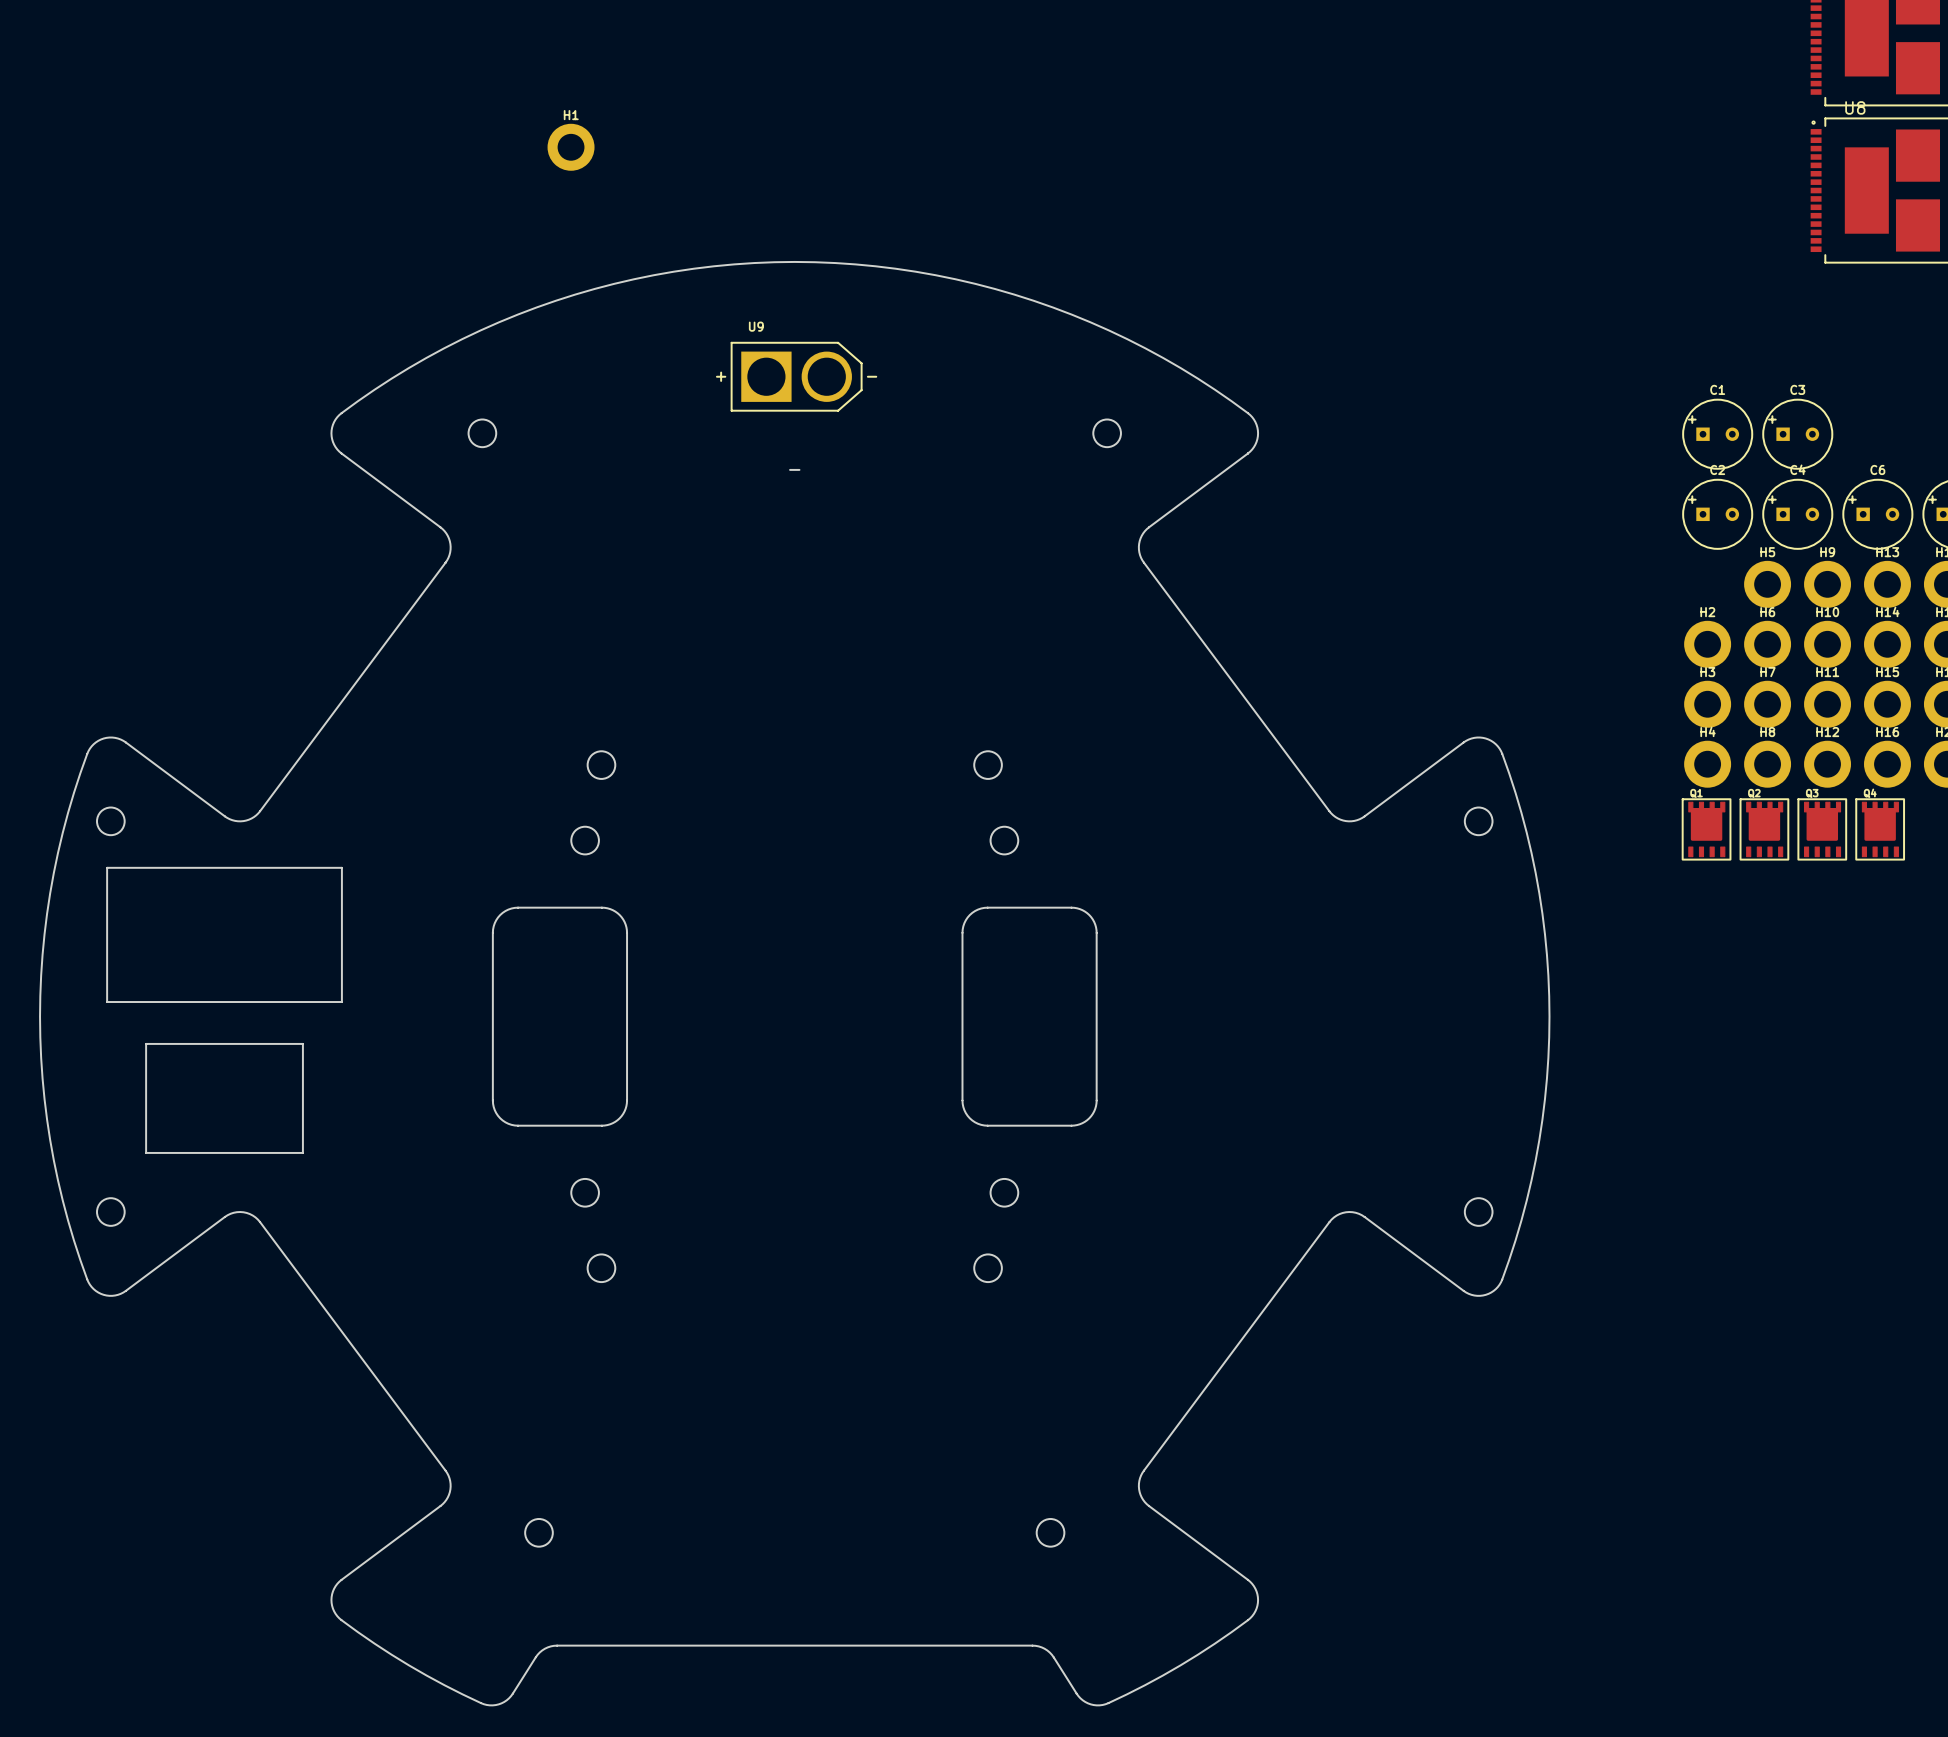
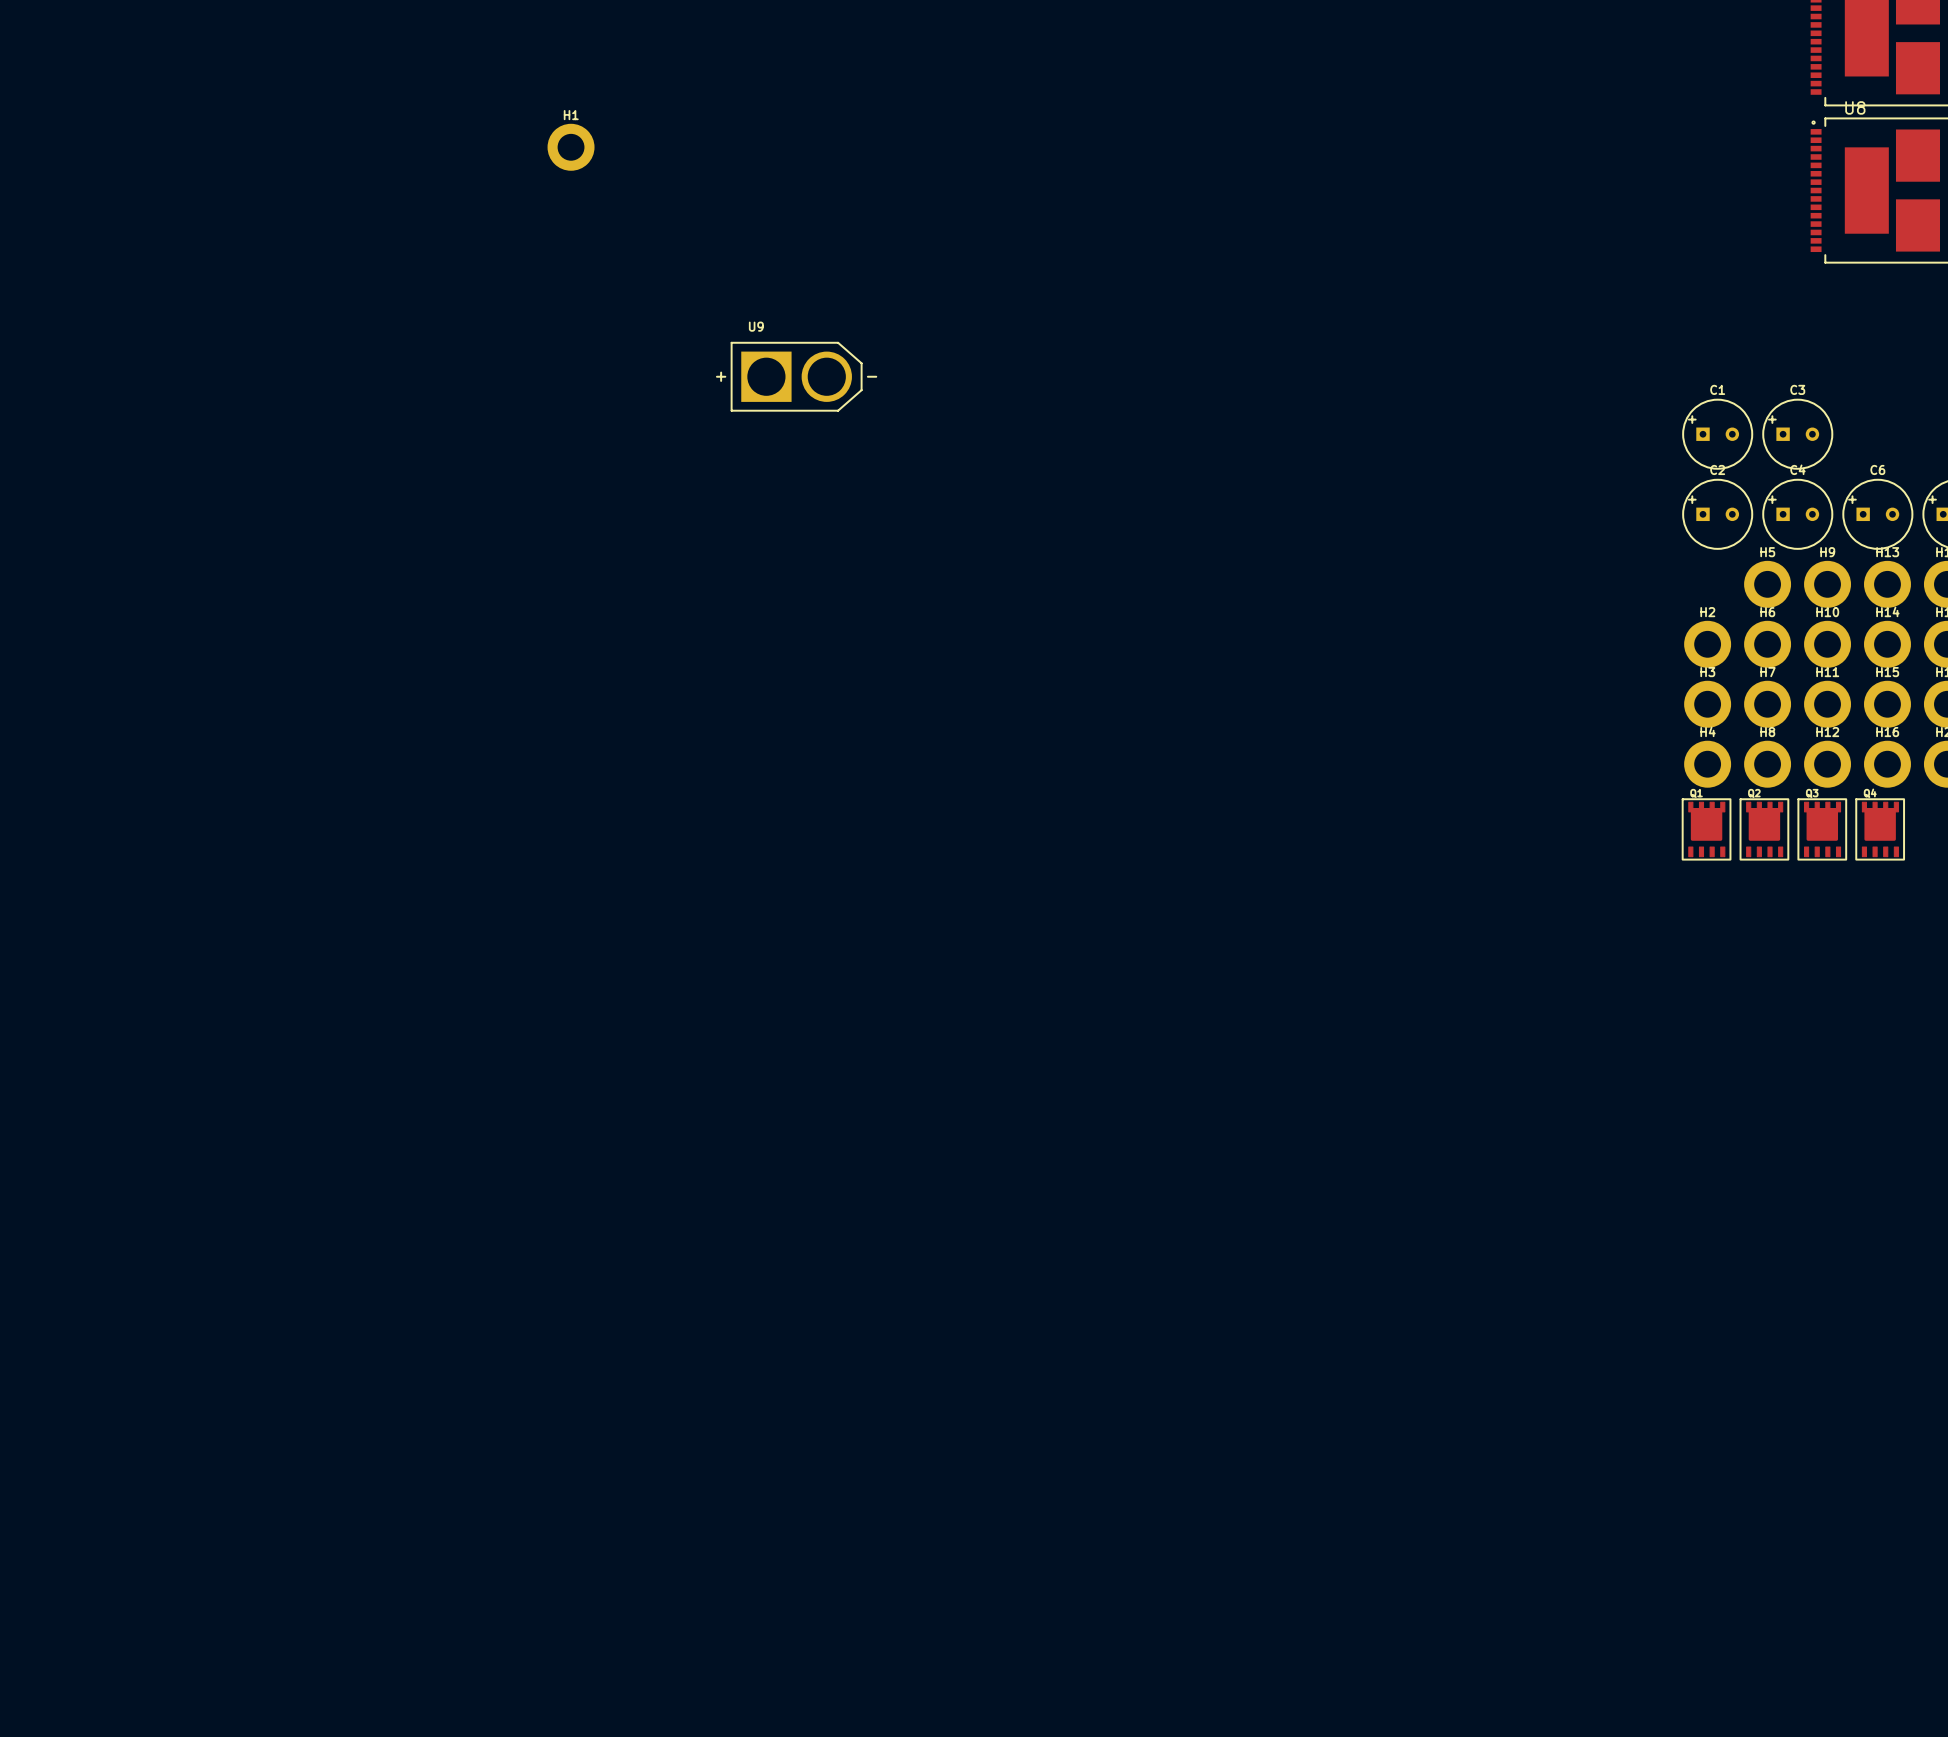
board edge: (341, 413) (335, 419) (332, 427) (332, 439) (335, 447) (442, 529) (450, 543) (448, 557) (260, 811) (251, 818) (237, 821) (227, 817) (120, 739) (112, 737) (103, 738) (91, 746) (73, 792) (53, 873) (42, 954) (40, 1016) (42, 1078) (53, 1160) (73, 1240) (91, 1286) (98, 1292) (106, 1295) (120, 1293) (227, 1215) (240, 1212) (252, 1215) (260, 1222) (448, 1475) (450, 1489) (442, 1504) (337, 1583) (332, 1591) (331, 1599) (332, 1608) (337, 1616) (374, 1643) (426, 1675) (481, 1703) (492, 1705) (501, 1703) (511, 1696) (539, 1652) (547, 1647) (557, 1645) (1035, 1645) (1044, 1648) (1051, 1654) (1080, 1698) (1090, 1704) (1099, 1705) (1108, 1703) (1162, 1675) (1197, 1654) (1248, 1620) (1255, 1611) (1257, 1602) (1257, 1594) (1253, 1586) (1146, 1504) (1139, 1492) (1141, 1475) (1329, 1222) (1336, 1215) (1349, 1212) (1361, 1215) (1468, 1293) (1477, 1295) (1485, 1294) (1497, 1286) (1515, 1240) (1535, 1160) (1544, 1099) (1549, 1016) (1544, 934) (1535, 873) (1515, 792) (1497, 746) (1485, 738) (1477, 737) (1468, 739) (1362, 817) (1348, 821) (1337, 818) (1329, 811) (1141, 557) (1139, 543) (1146, 529) (1252, 449) (1256, 441) (1258, 433) (1256, 424) (1252, 417) (1198, 378) (1145, 348) (1090, 322) (1033, 300) (975, 283) (915, 271) (855, 264) (794, 261) (734, 264) (673, 271) (614, 283) (555, 300) (499, 322) (444, 348) (391, 378) (341, 413) -> none
round board edge: [467, 418, 498, 449] -> none
round board edge: [1092, 418, 1122, 449] -> none
board edge: (790, 469) (799, 469) -> none
round board edge: [586, 750, 617, 780] -> none
round board edge: [973, 750, 1003, 780] -> none
round board edge: [96, 806, 126, 837] -> none
round board edge: [1464, 806, 1494, 837] -> none
round board edge: [570, 825, 600, 856] -> none
round board edge: [989, 825, 1020, 856] -> none
board edge: (107, 867) (341, 867) (341, 1002) (107, 1002) (107, 867) -> none
board edge: (518, 907) (604, 907) (615, 911) (624, 921) (627, 932) (626, 1103) (621, 1116) (612, 1123) (601, 1125) (514, 1125) (502, 1120) (494, 1110) (492, 1100) (493, 929) (500, 915) (508, 909) (518, 907) -> none
board edge: (987, 907) (1074, 907) (1087, 913) (1094, 921) (1096, 932) (1096, 1103) (1091, 1116) (1082, 1123) (1071, 1125) (984, 1125) (972, 1120) (964, 1110) (962, 1100) (962, 929) (969, 915) (978, 909) (987, 907) -> none
board edge: (146, 1043) (302, 1043) (302, 1152) (146, 1152) (146, 1043) -> none
round board edge: [570, 1178, 600, 1208] -> none
round board edge: [989, 1178, 1020, 1208] -> none
round board edge: [96, 1197, 126, 1227] -> none
round board edge: [1464, 1197, 1494, 1227] -> none
round board edge: [586, 1253, 617, 1283] -> none
round board edge: [973, 1253, 1003, 1283] -> none
round board edge: [524, 1518, 554, 1548] -> none
round board edge: [1035, 1518, 1066, 1548] -> none

